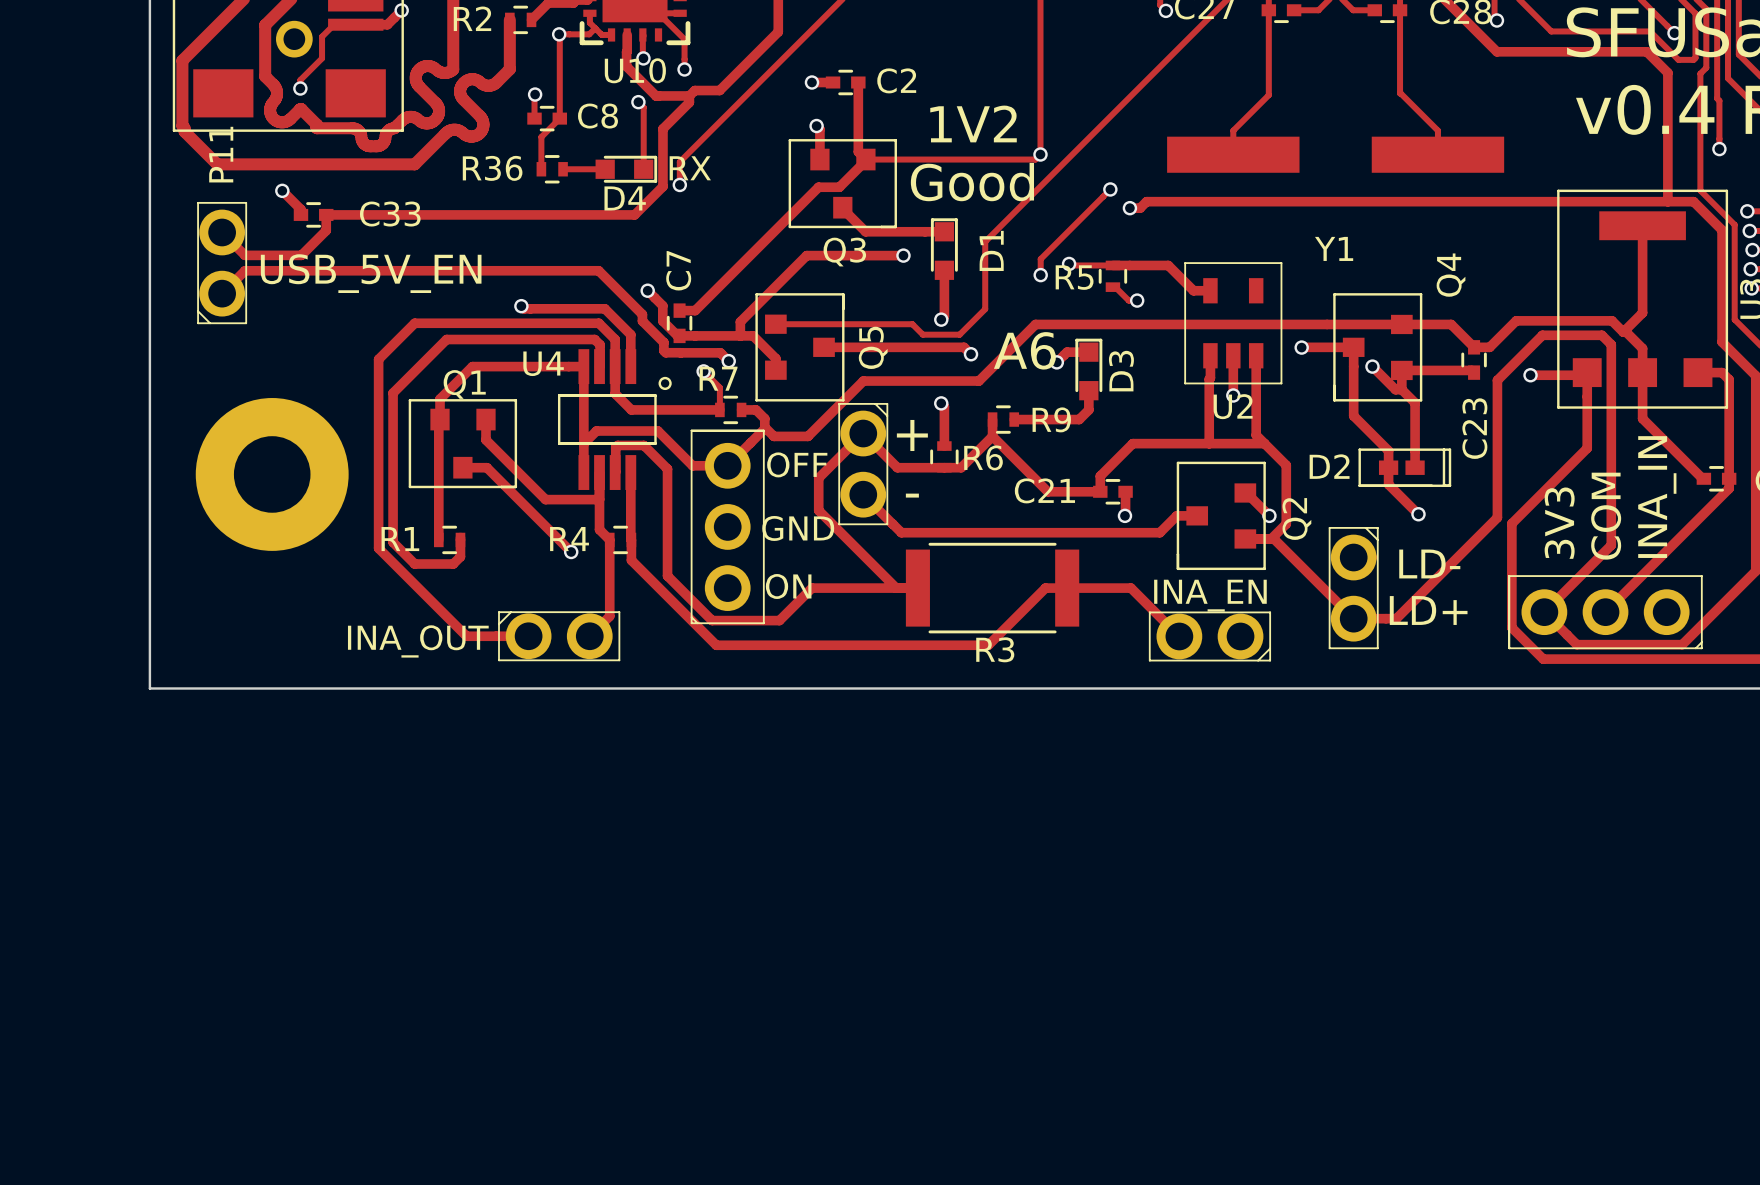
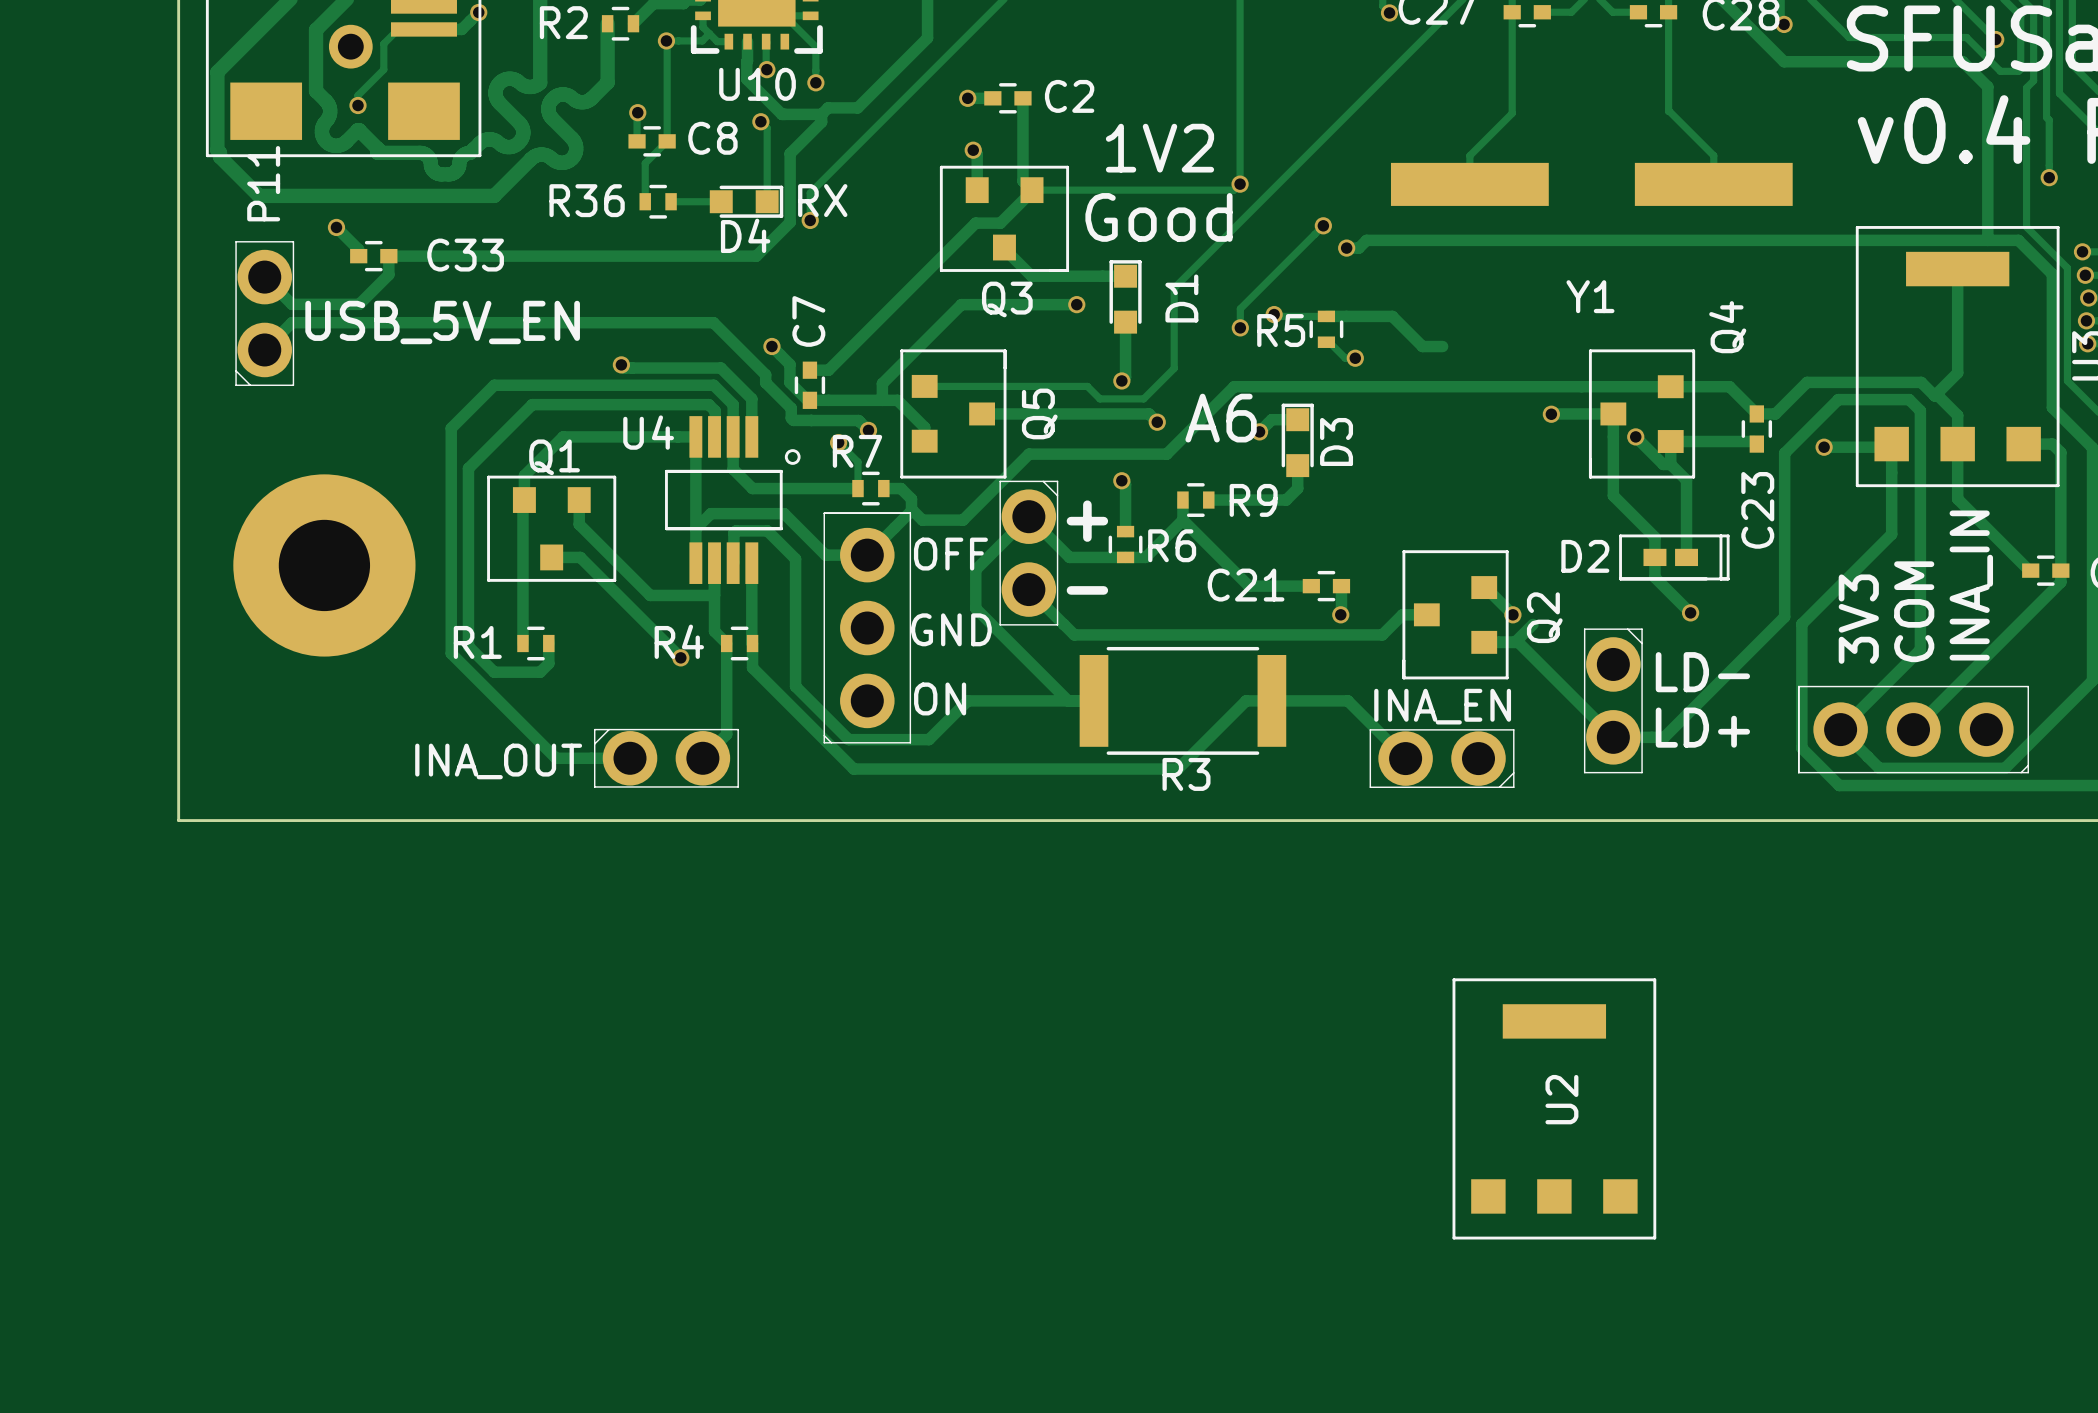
U2 footprint: [1184, 262, 1283, 385] -> [1452, 978, 1657, 1240]
track: (1210, 355) (1209, 443) -> none
track: (1233, 355) (1233, 395) -> none
track: (1256, 355) (1256, 435) (1286, 465) (1286, 523) -> none
via: (1233, 395) -> none
U2 name position: U2 (1233, 406) -> U2 (1561, 1099)
track: (1264, 443) (1132, 443) (1100, 476) (1100, 491) -> none

